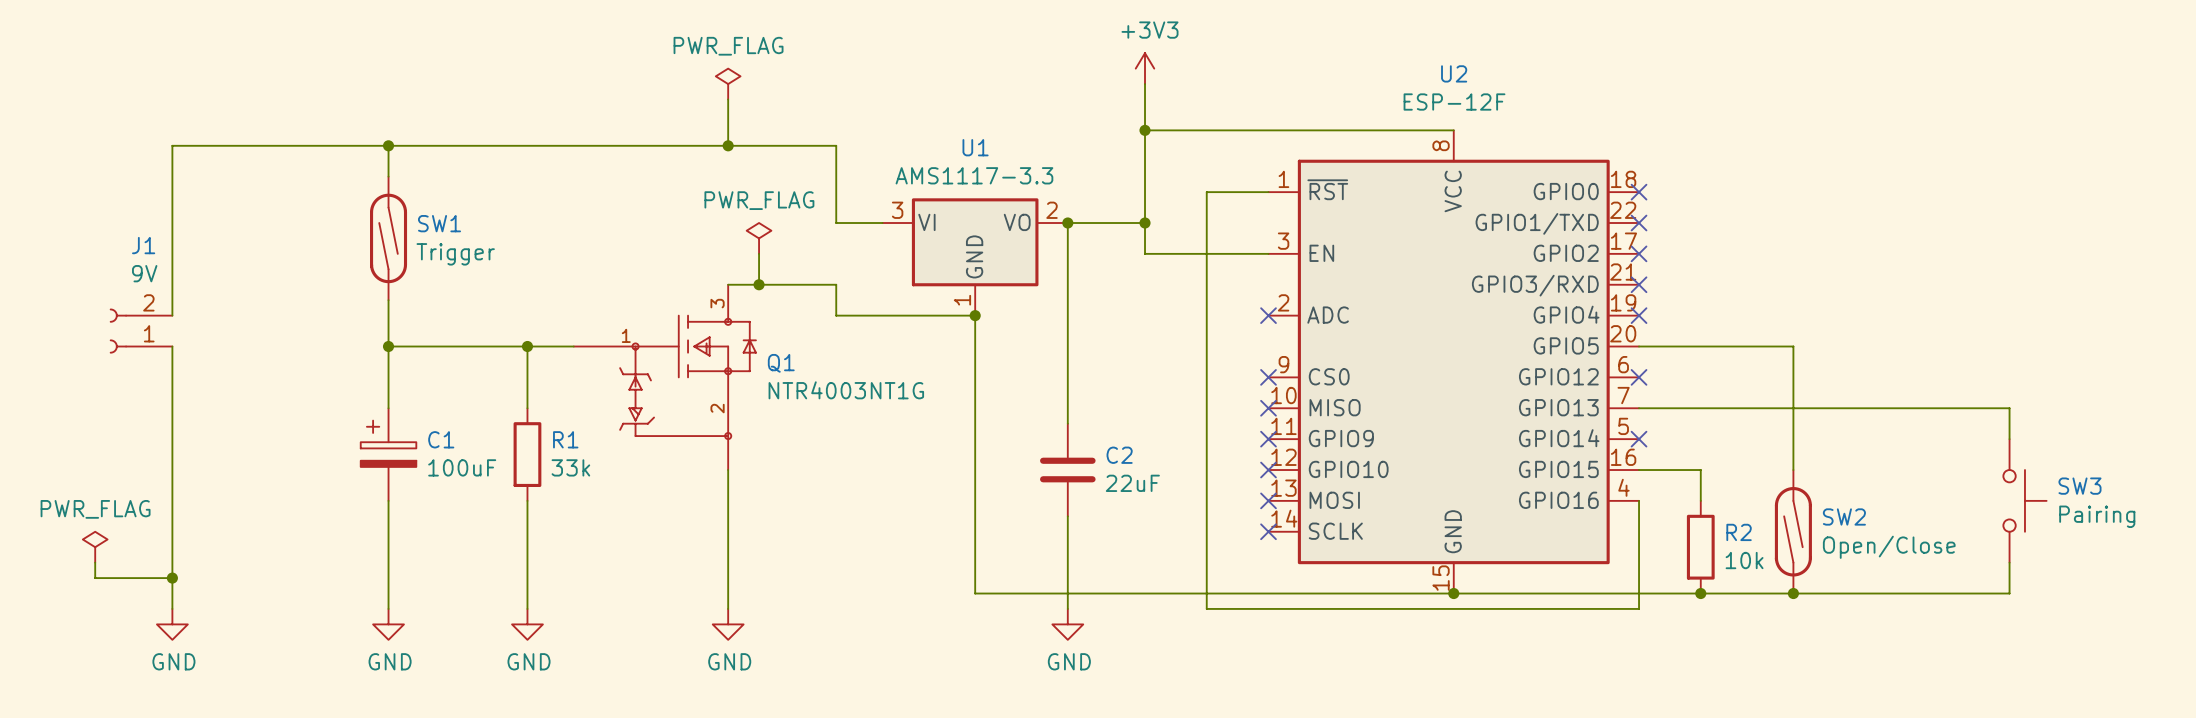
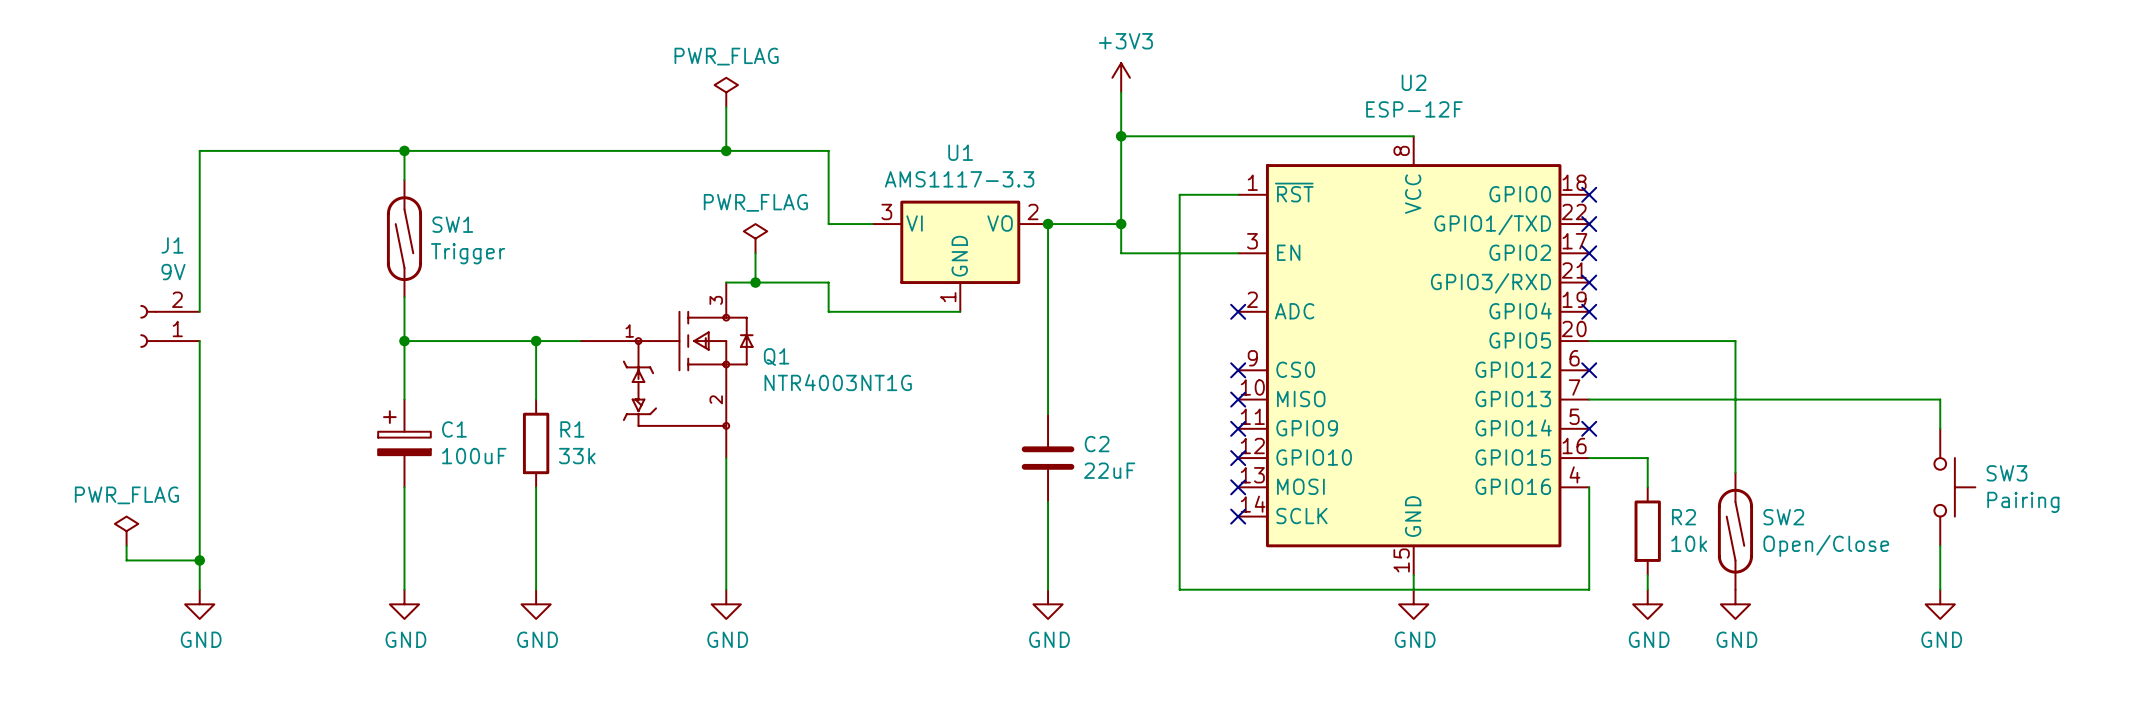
wire: (975, 315) (975, 593) (2009, 593) -> (1940, 589) (1940, 575)
junction: (975, 315) -> none
SW2 position: (1793, 531) -> (1735, 531)
wire: none -> (1413, 575) (1413, 589)
junction: (1453, 593) -> none
wire: none -> (1647, 575) (1647, 589)
junction: (1700, 593) -> none
junction: (1793, 593) -> none
power symbol: none -> GND (1413, 604)
power symbol: none -> GND (1647, 604)
power symbol: none -> GND (1735, 604)
power symbol: none -> GND (1940, 604)

